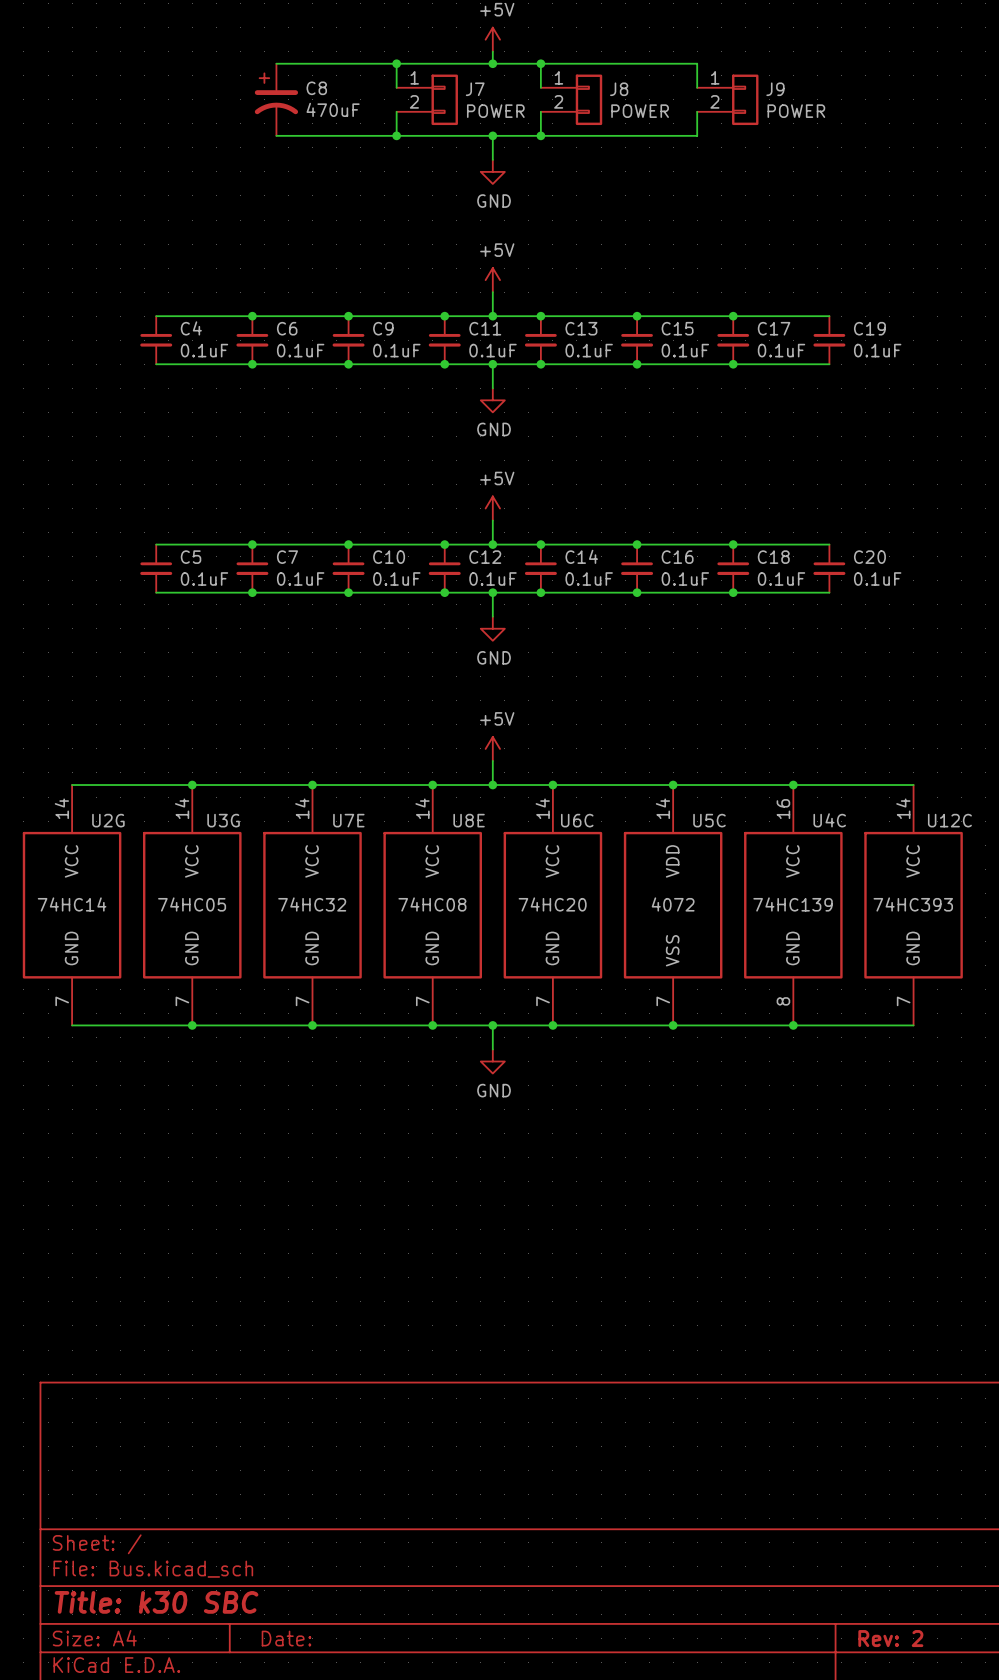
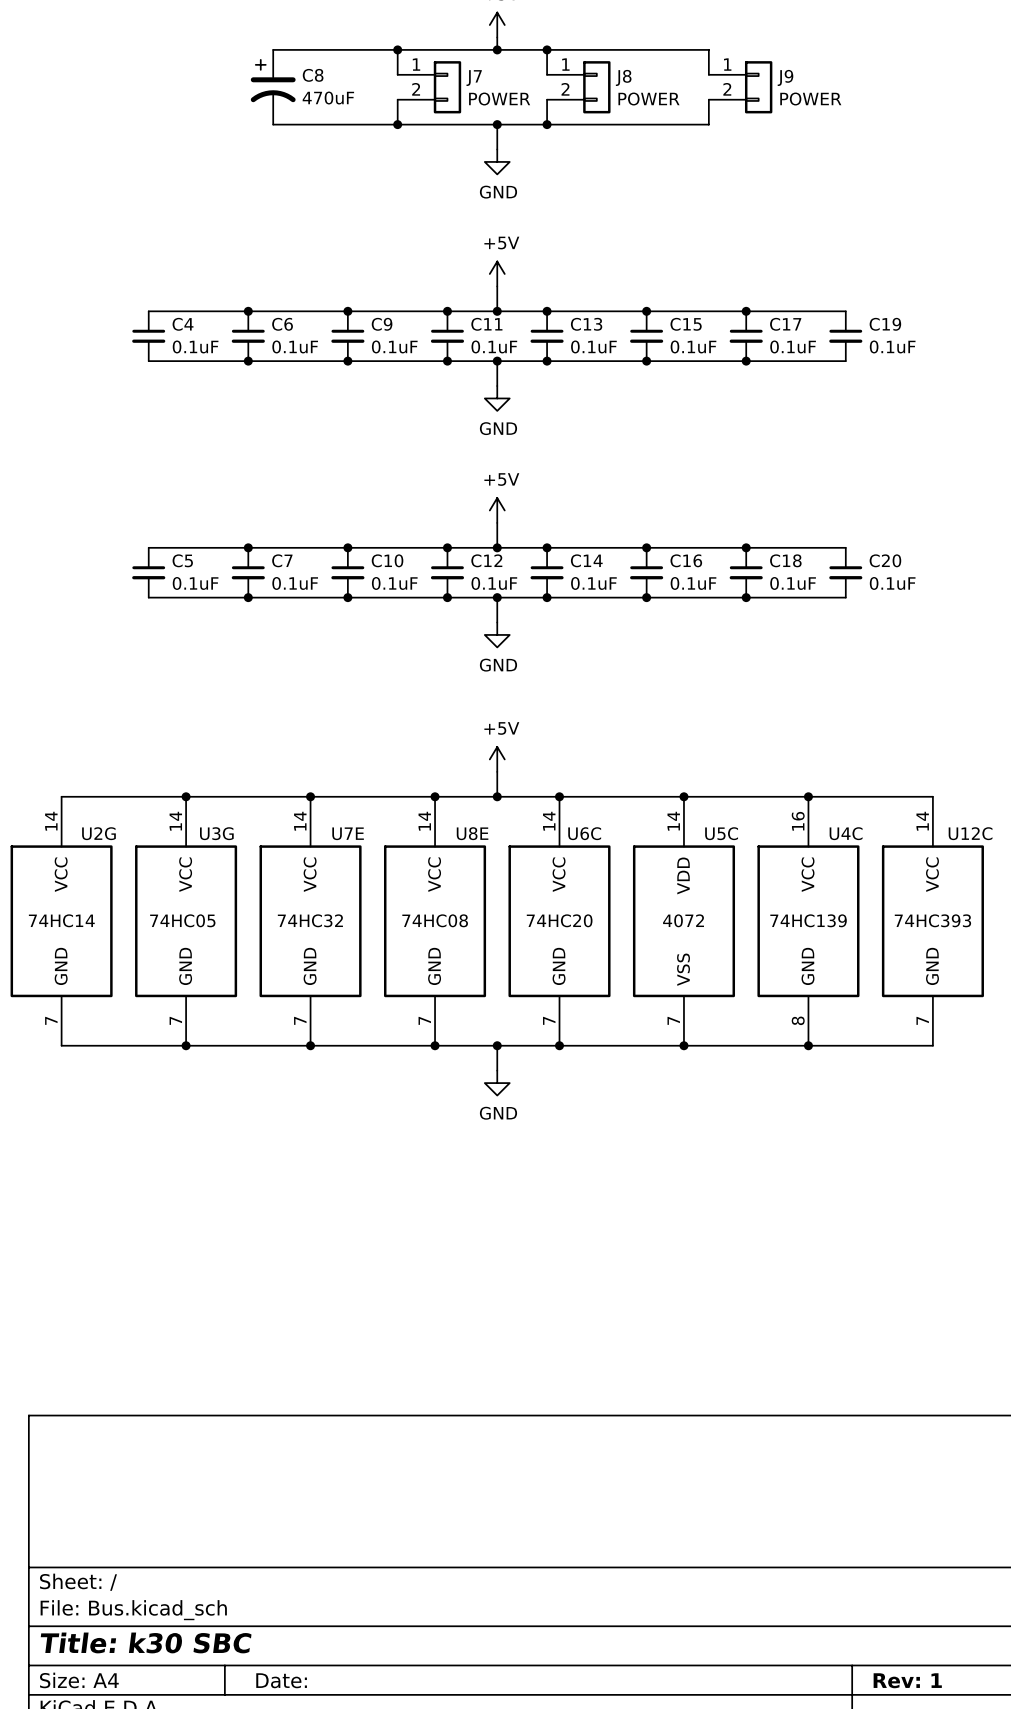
title block: Rev: 2 (890, 1638) -> Rev: 1 (907, 1680)

